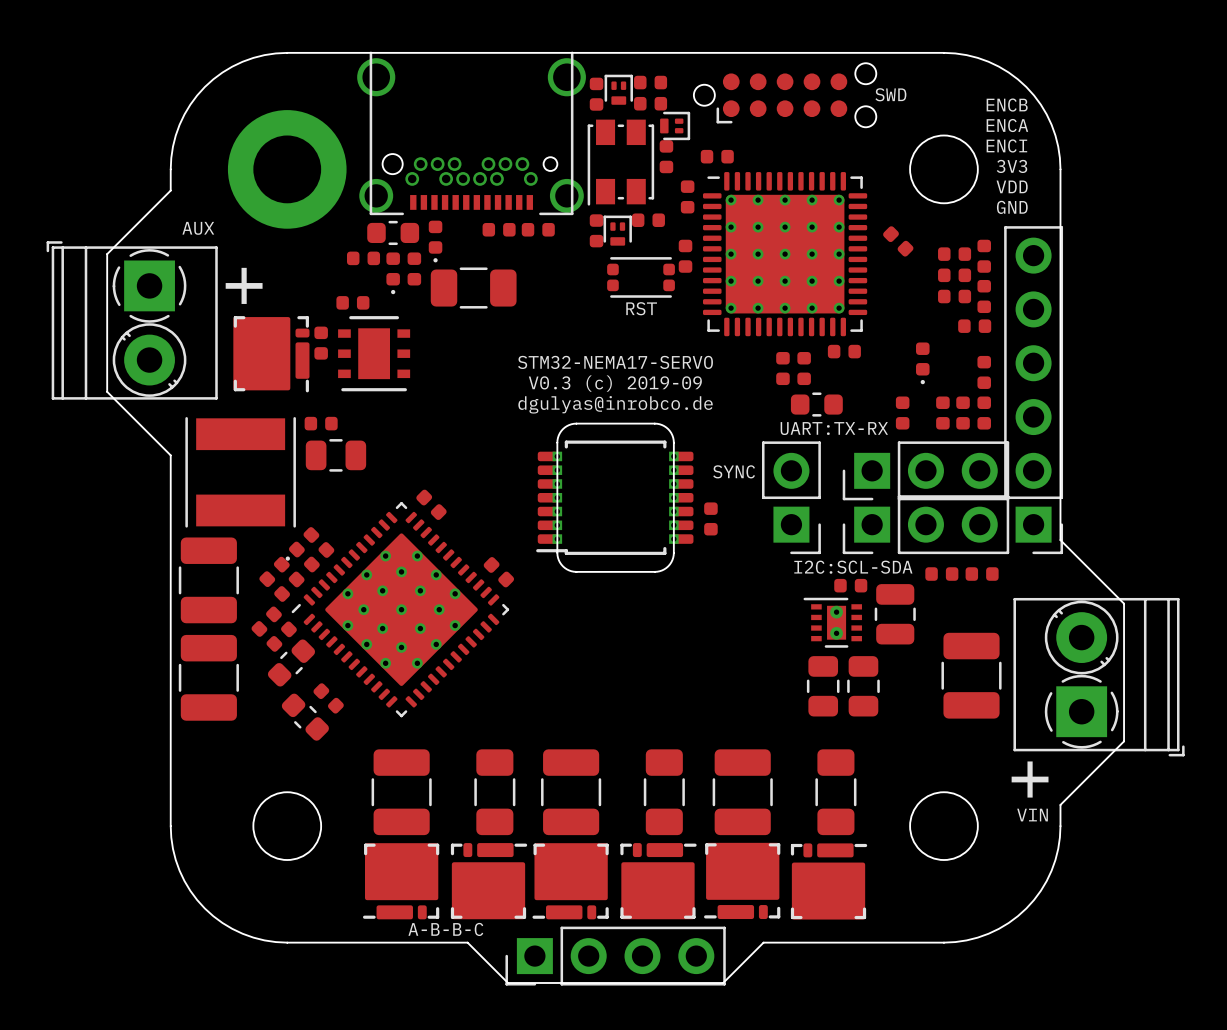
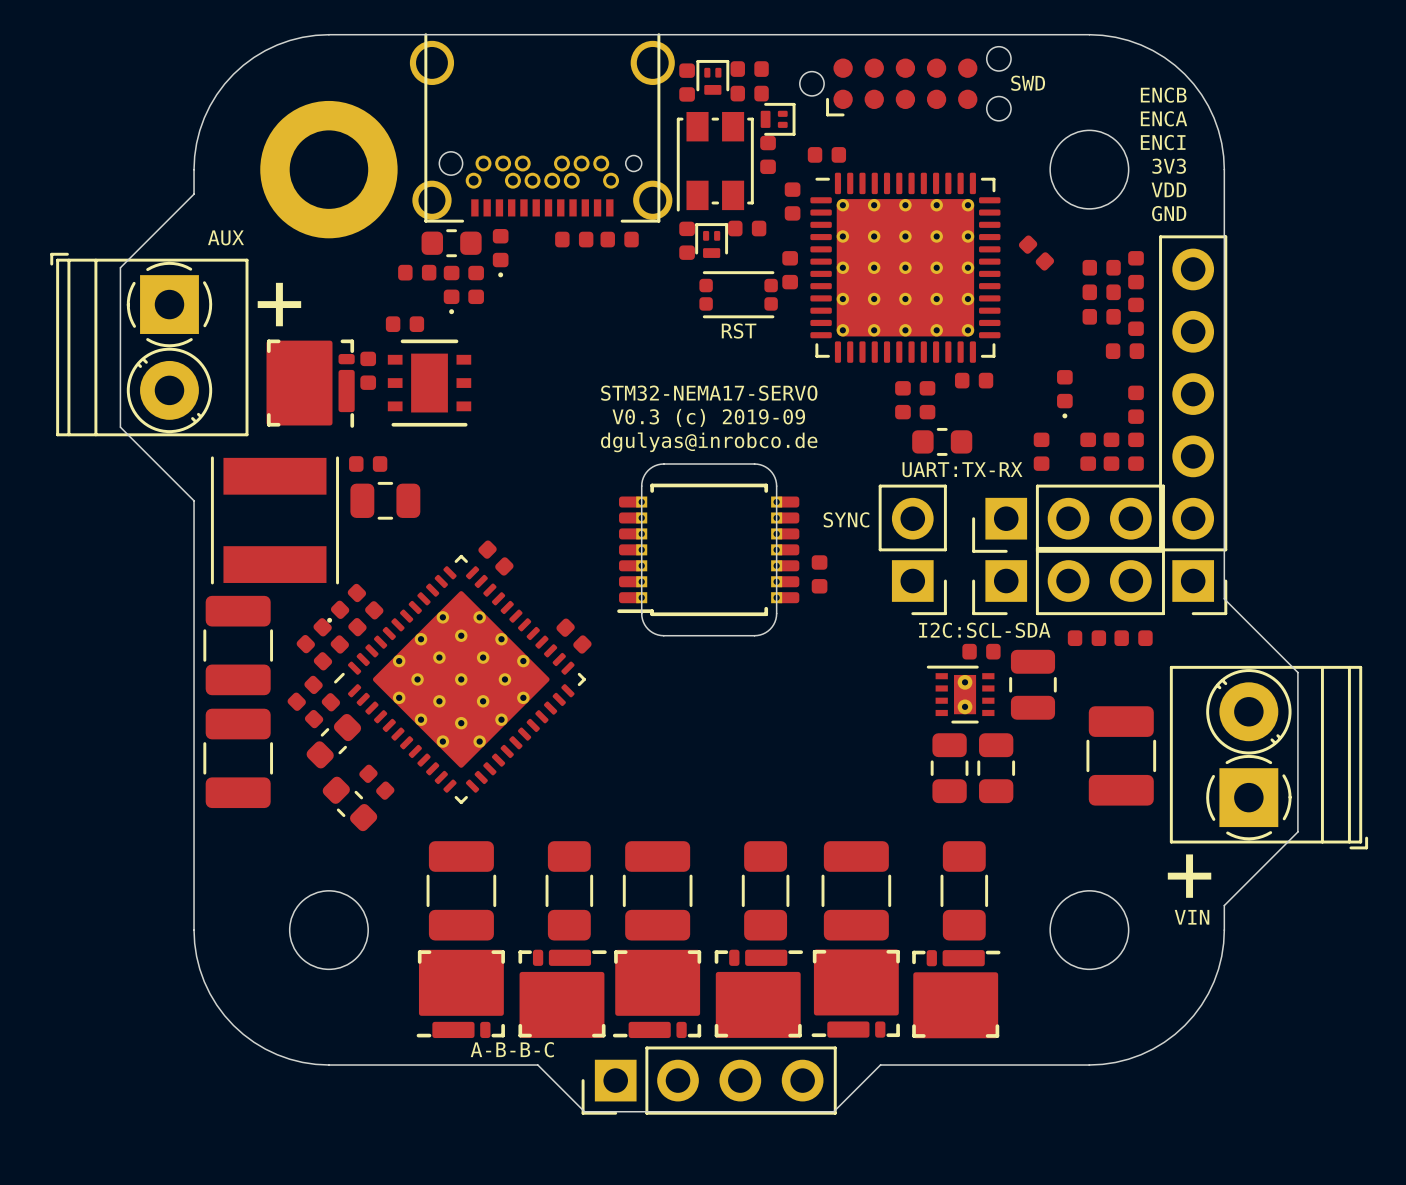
part: (473, 288) -> none

